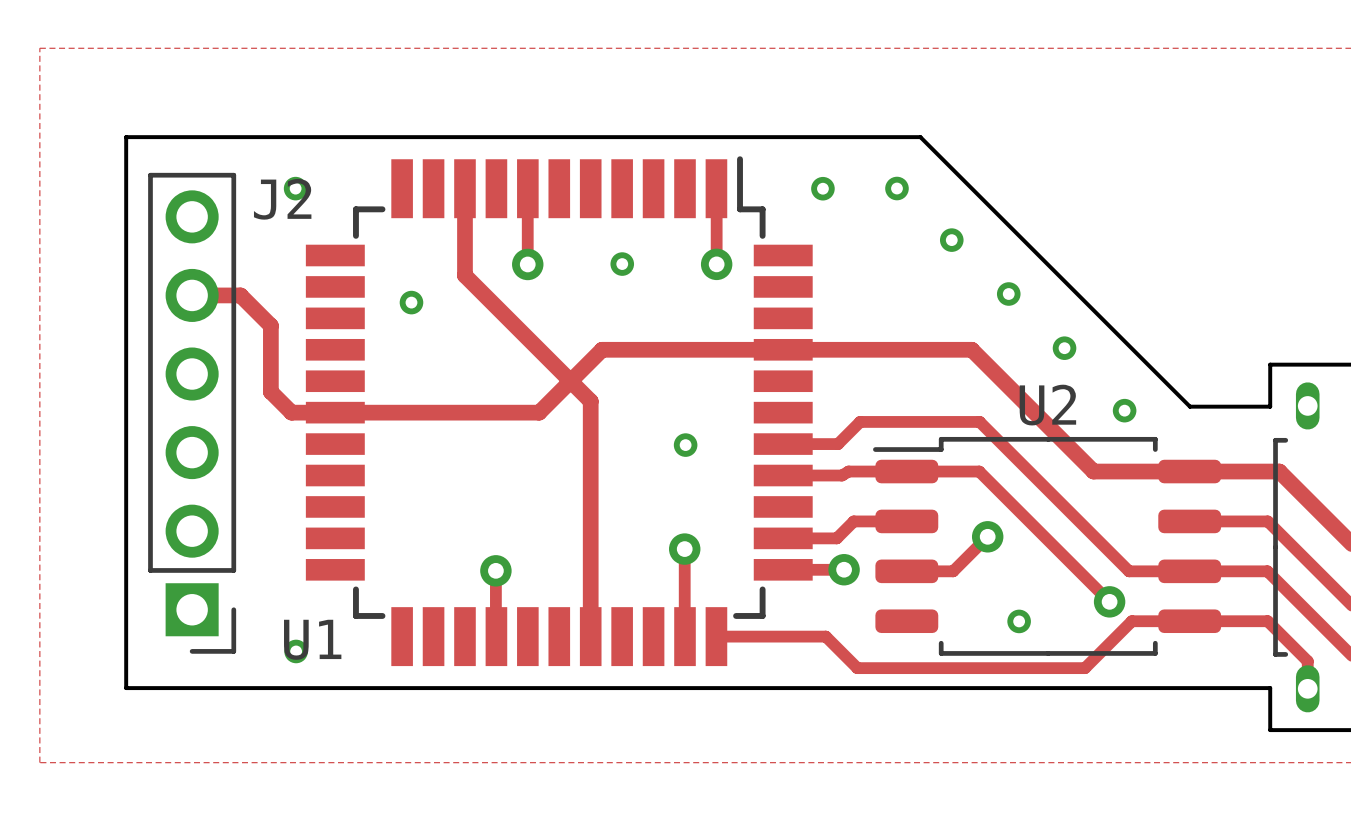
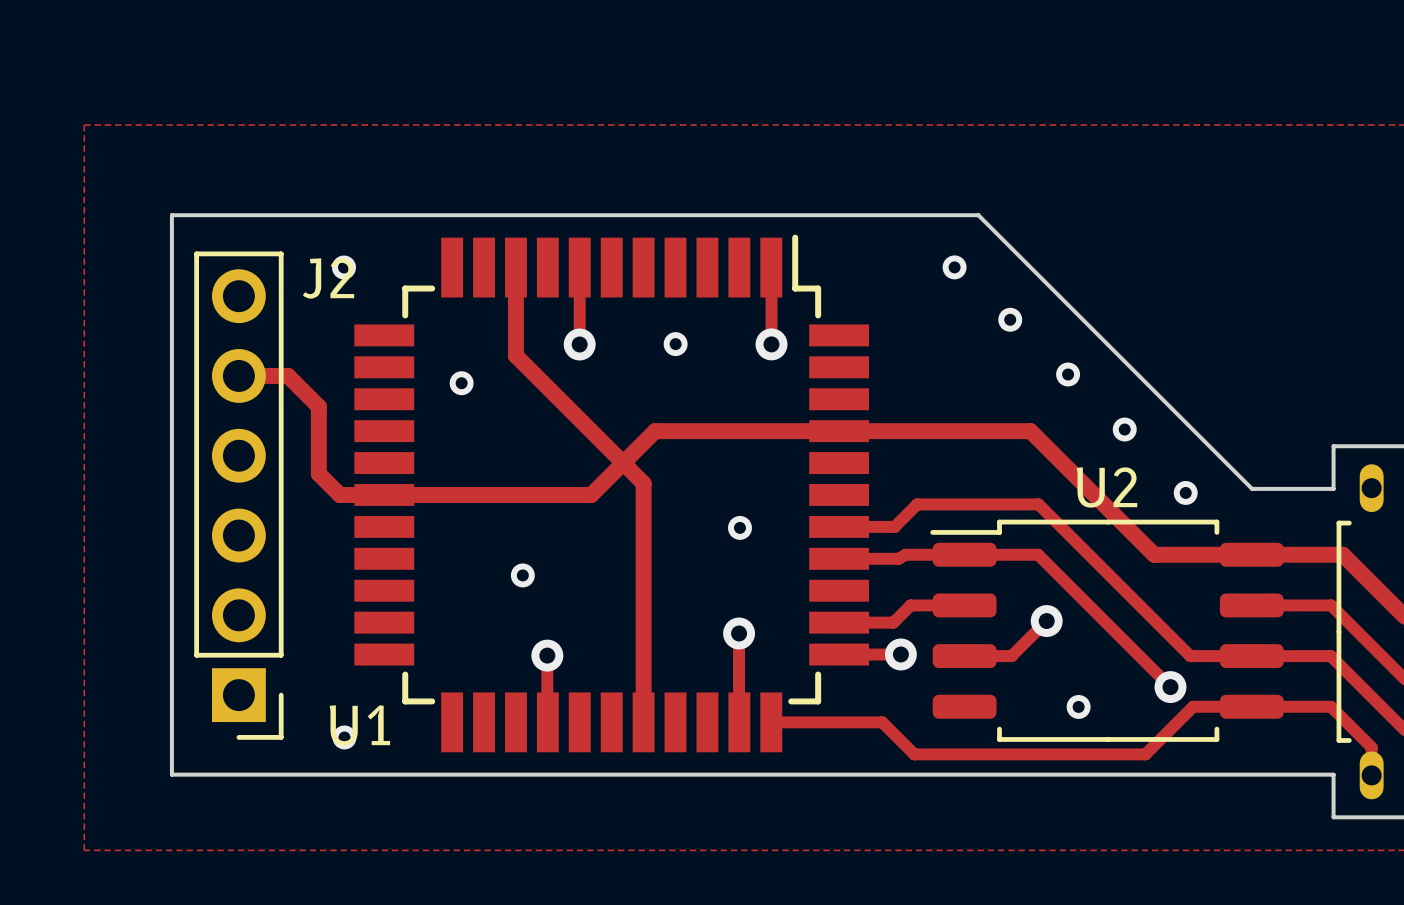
via: (822, 188) -> none
via: none -> (522, 575)

